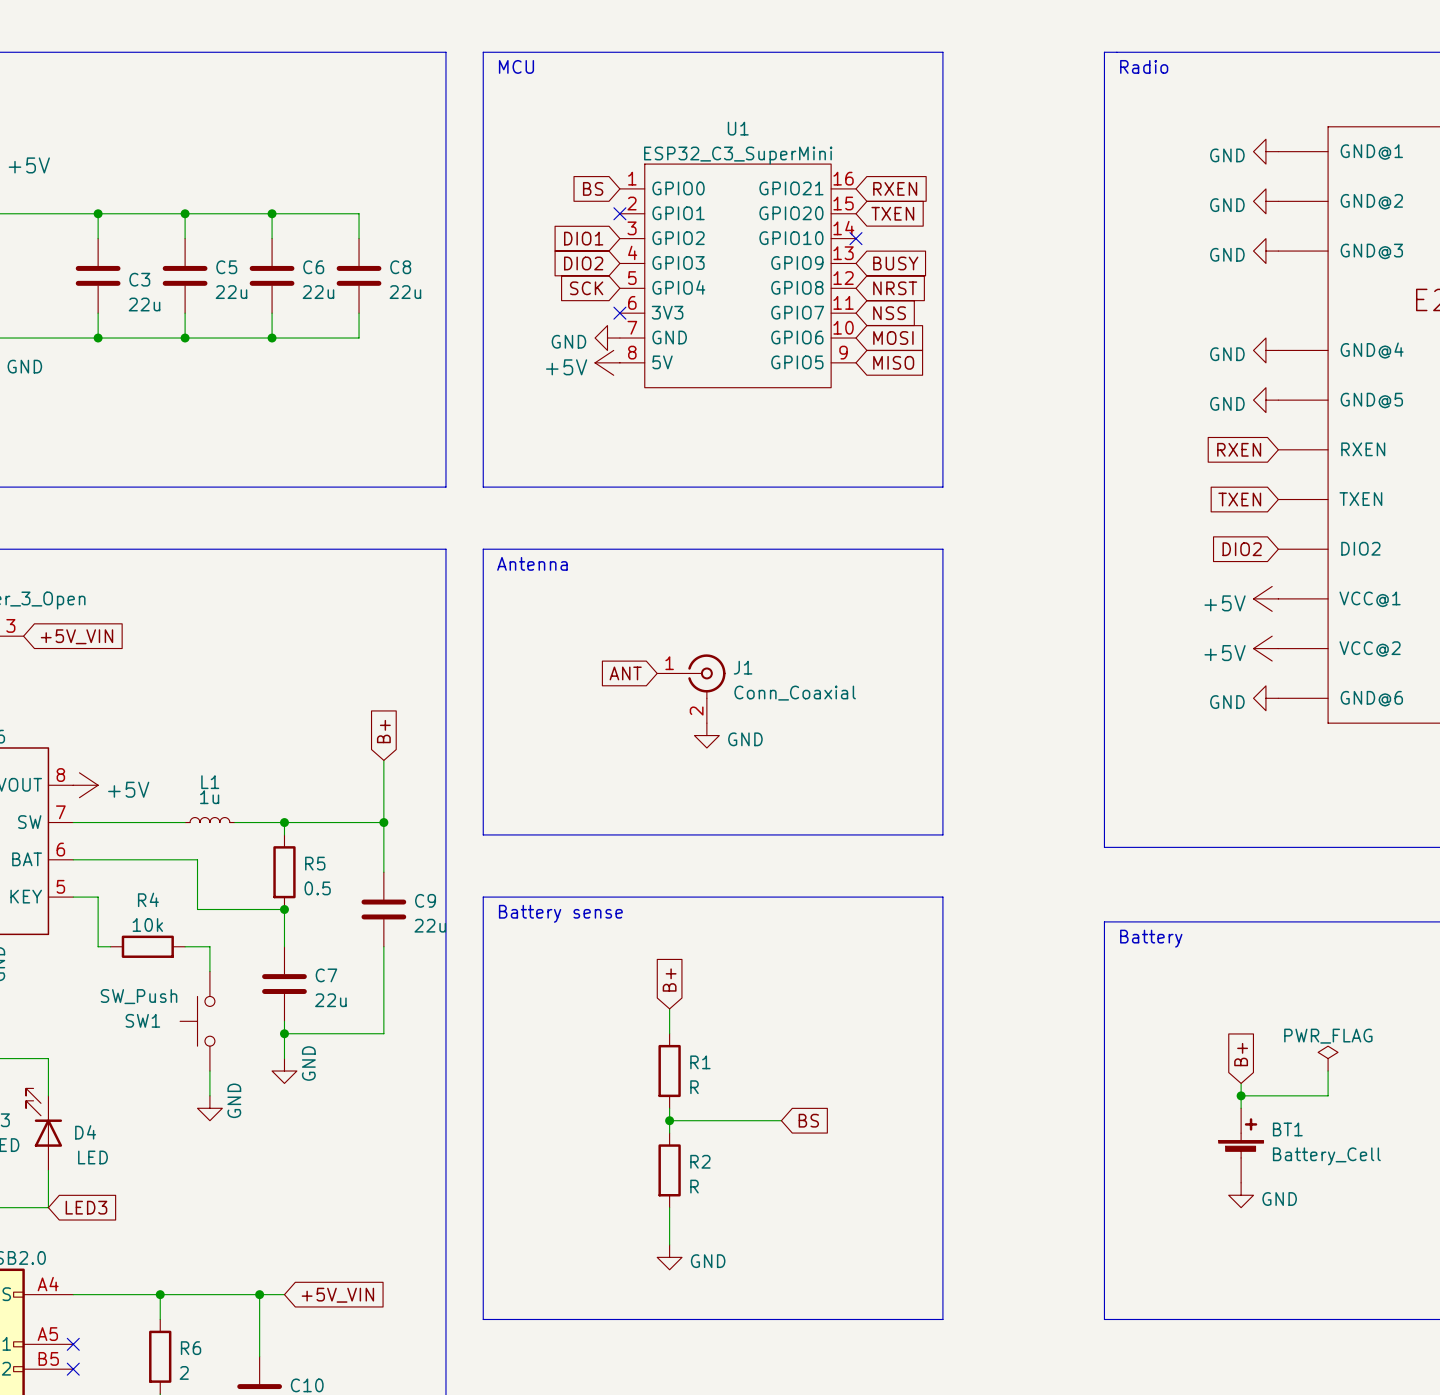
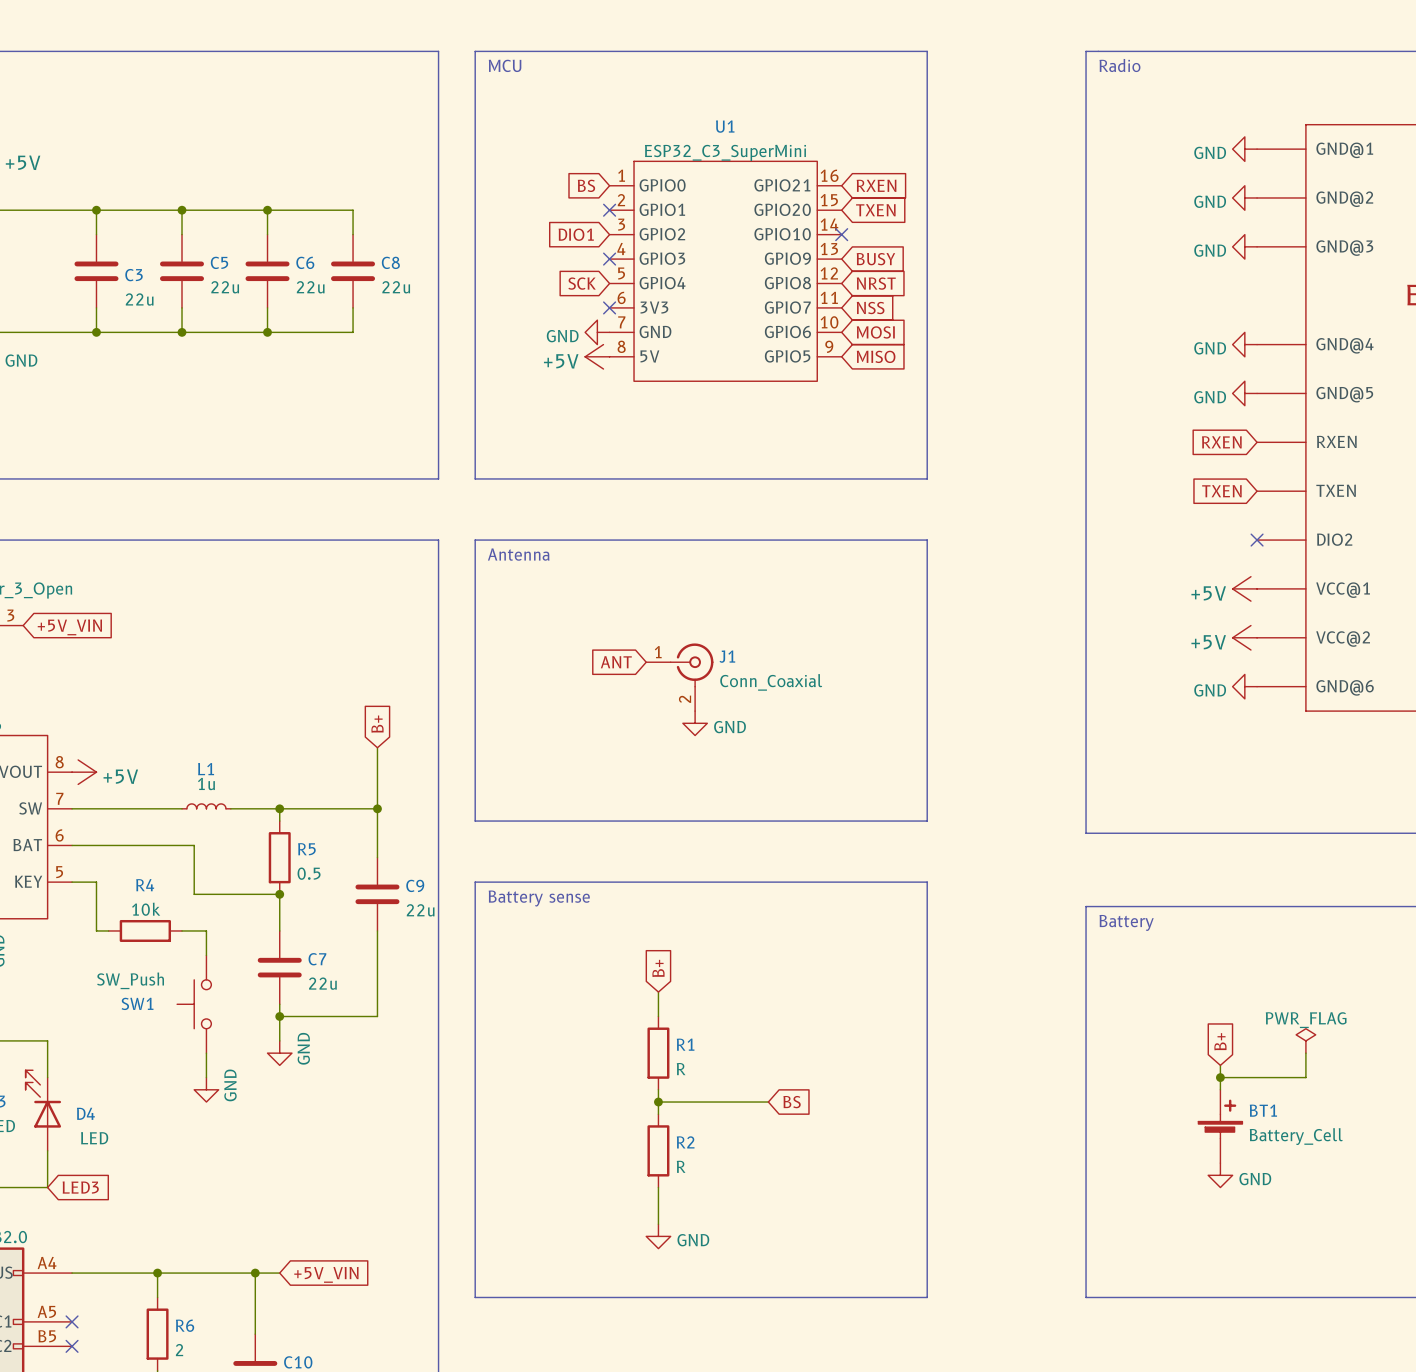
global label: DIO2 (583, 263) -> none
no-connect mark: none -> (609, 259)
global label: DIO2 (1242, 549) -> none
no-connect mark: none -> (1257, 540)

